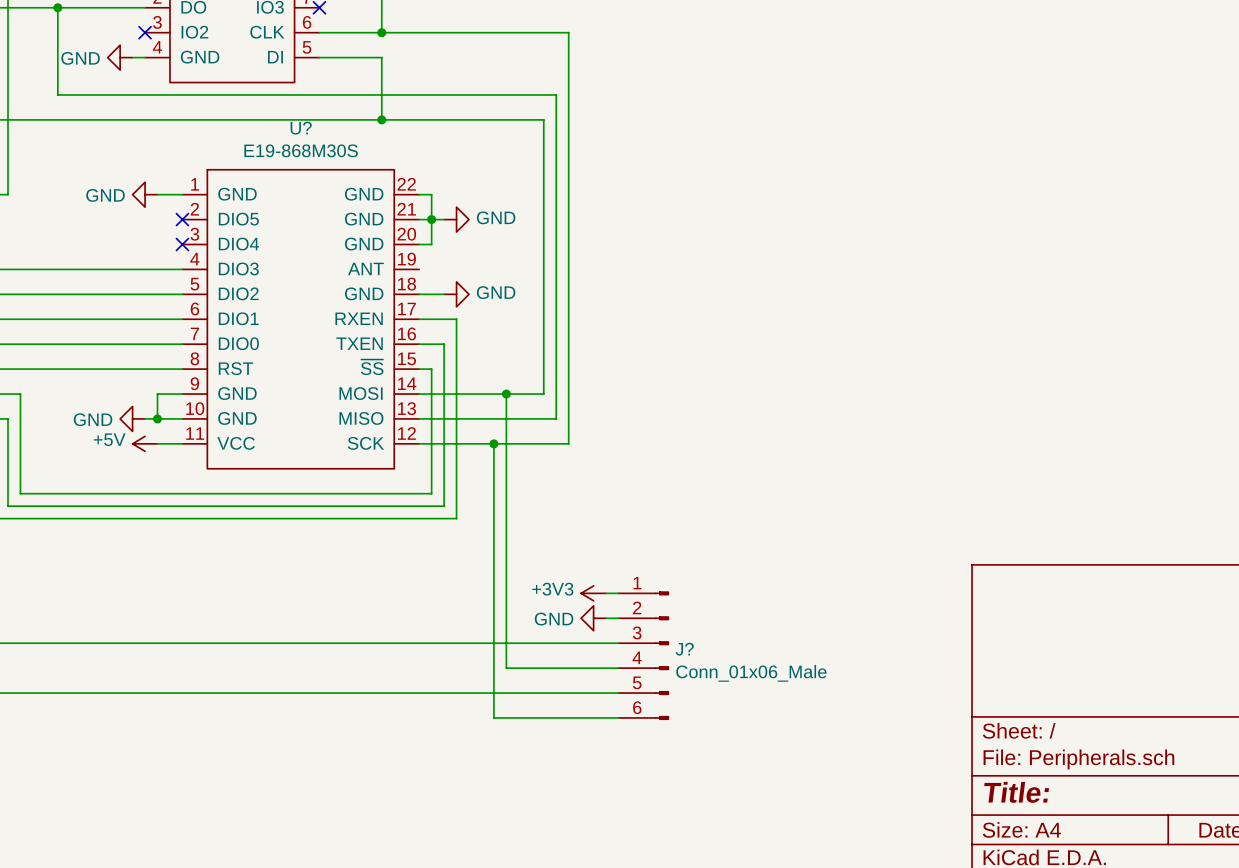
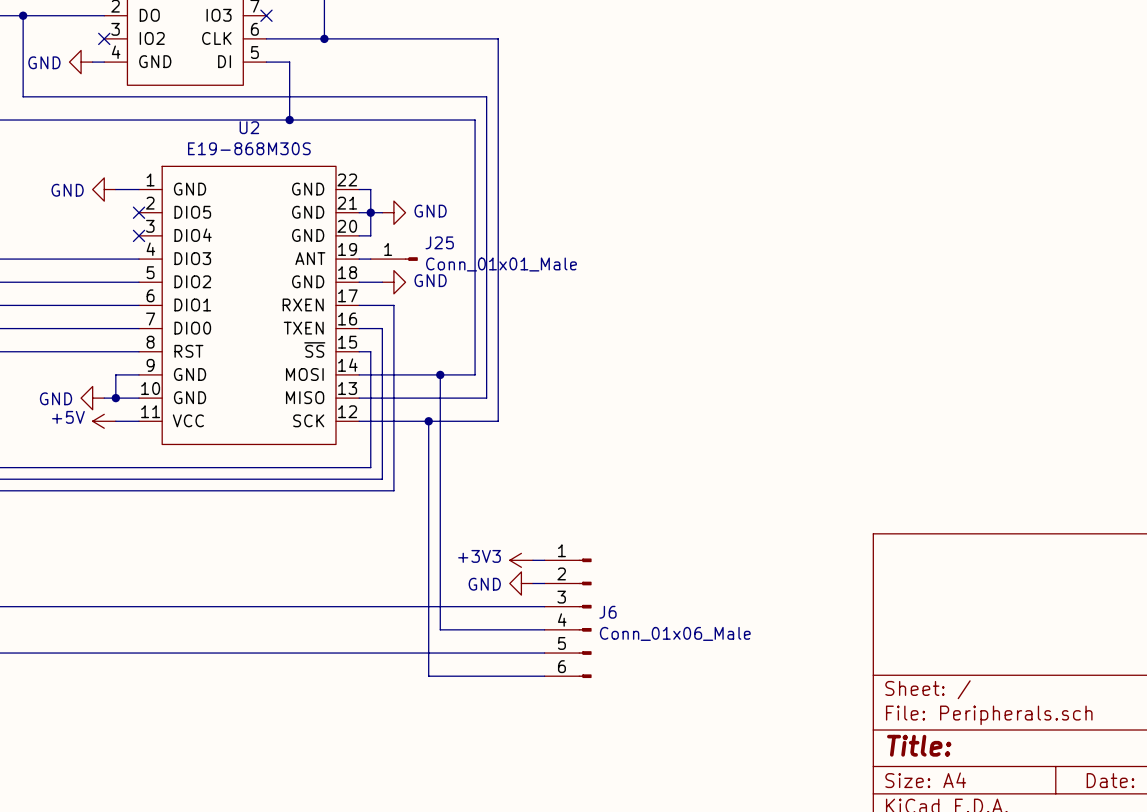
wire: (344, 57) (381, 57) (381, 119) -> (289, 62) (289, 120)
junction position: (381, 119) -> (289, 120)
U? name: U? (301, 128) -> U2 (249, 127)
wire: none -> (359, 259) (370, 259)
J25: none -> Conn_01x01_Male (394, 259)
J? name: J? (684, 649) -> J6 (607, 612)

